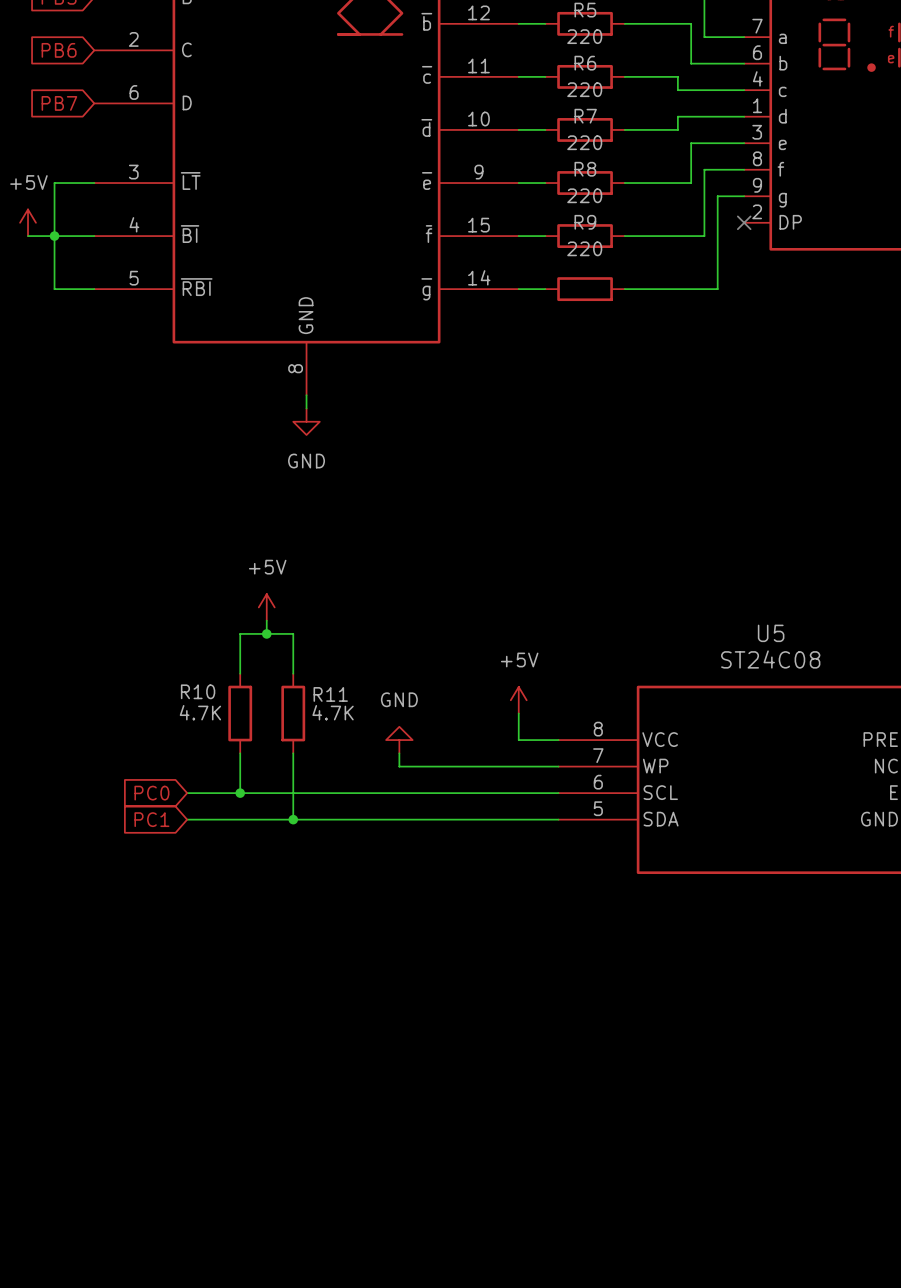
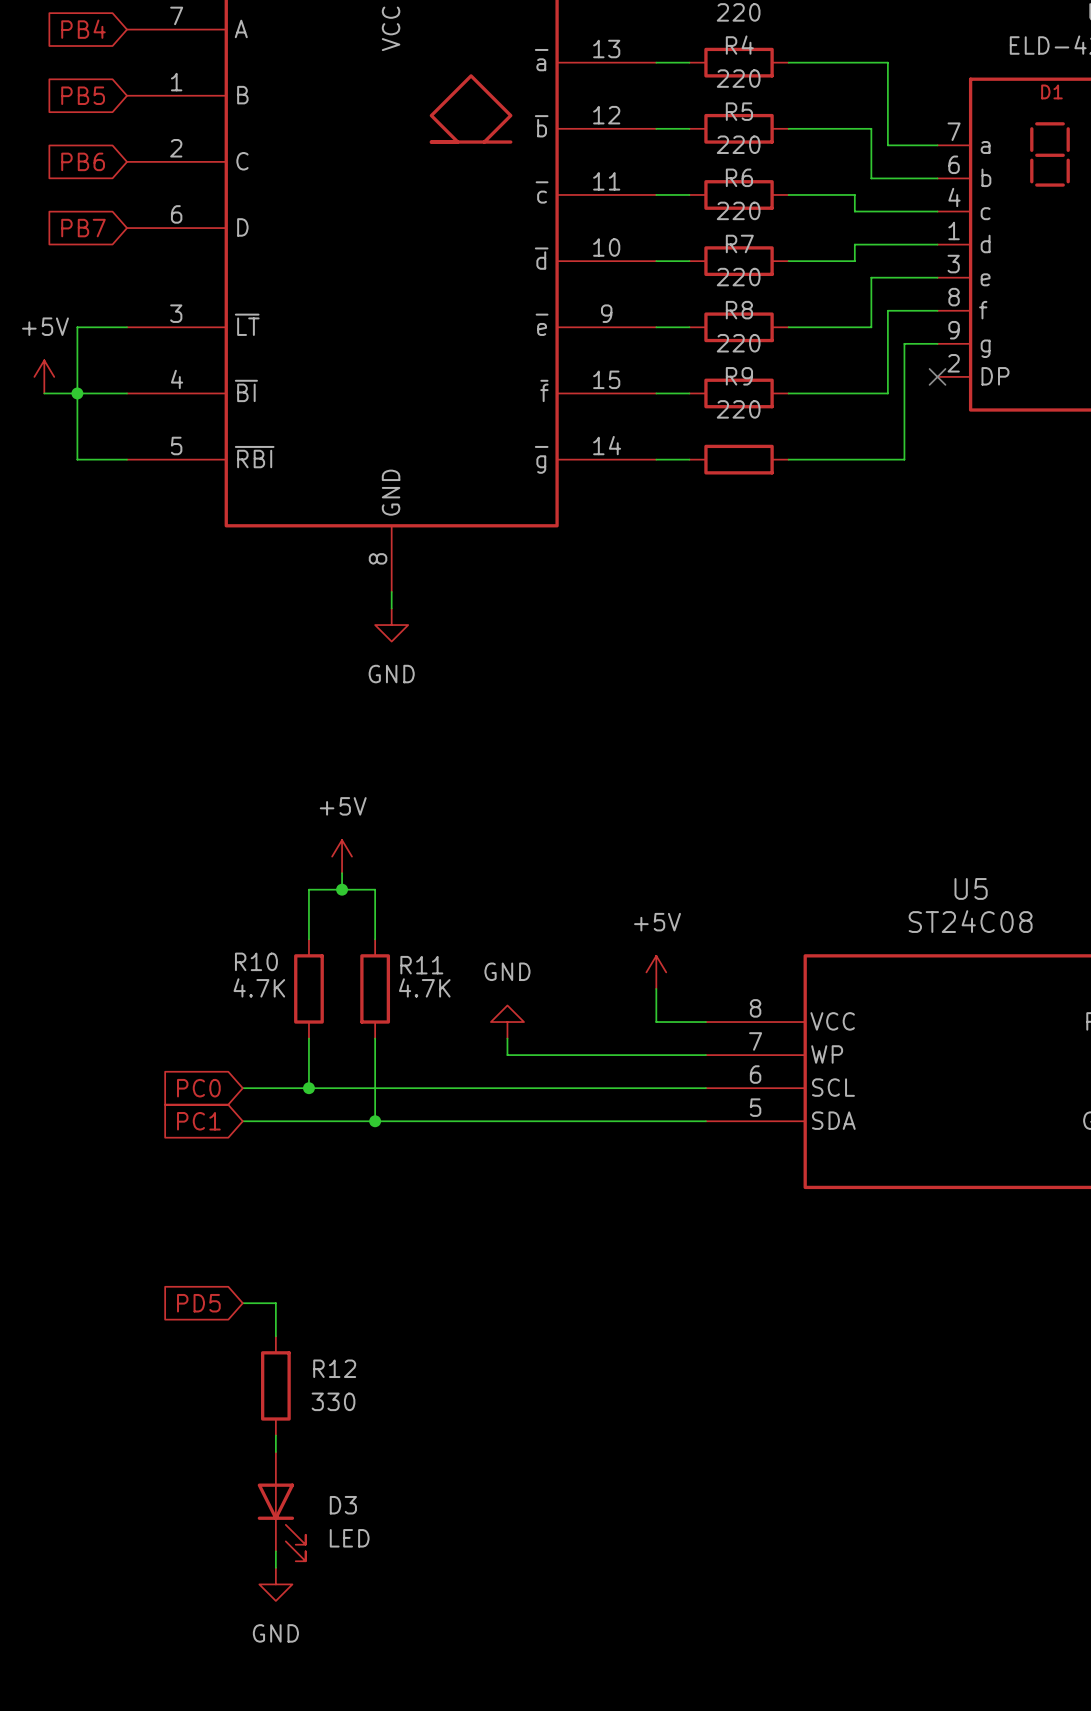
global label: none -> PD5 (198, 1303)
wire: none -> (242, 1303) (275, 1303) (275, 1336)
R12: none -> 330 (275, 1385)
wire: none -> (275, 1435) (275, 1452)
D3: none -> LED (281, 1506)
wire: none -> (275, 1551) (275, 1567)
power symbol: none -> GND (275, 1584)

